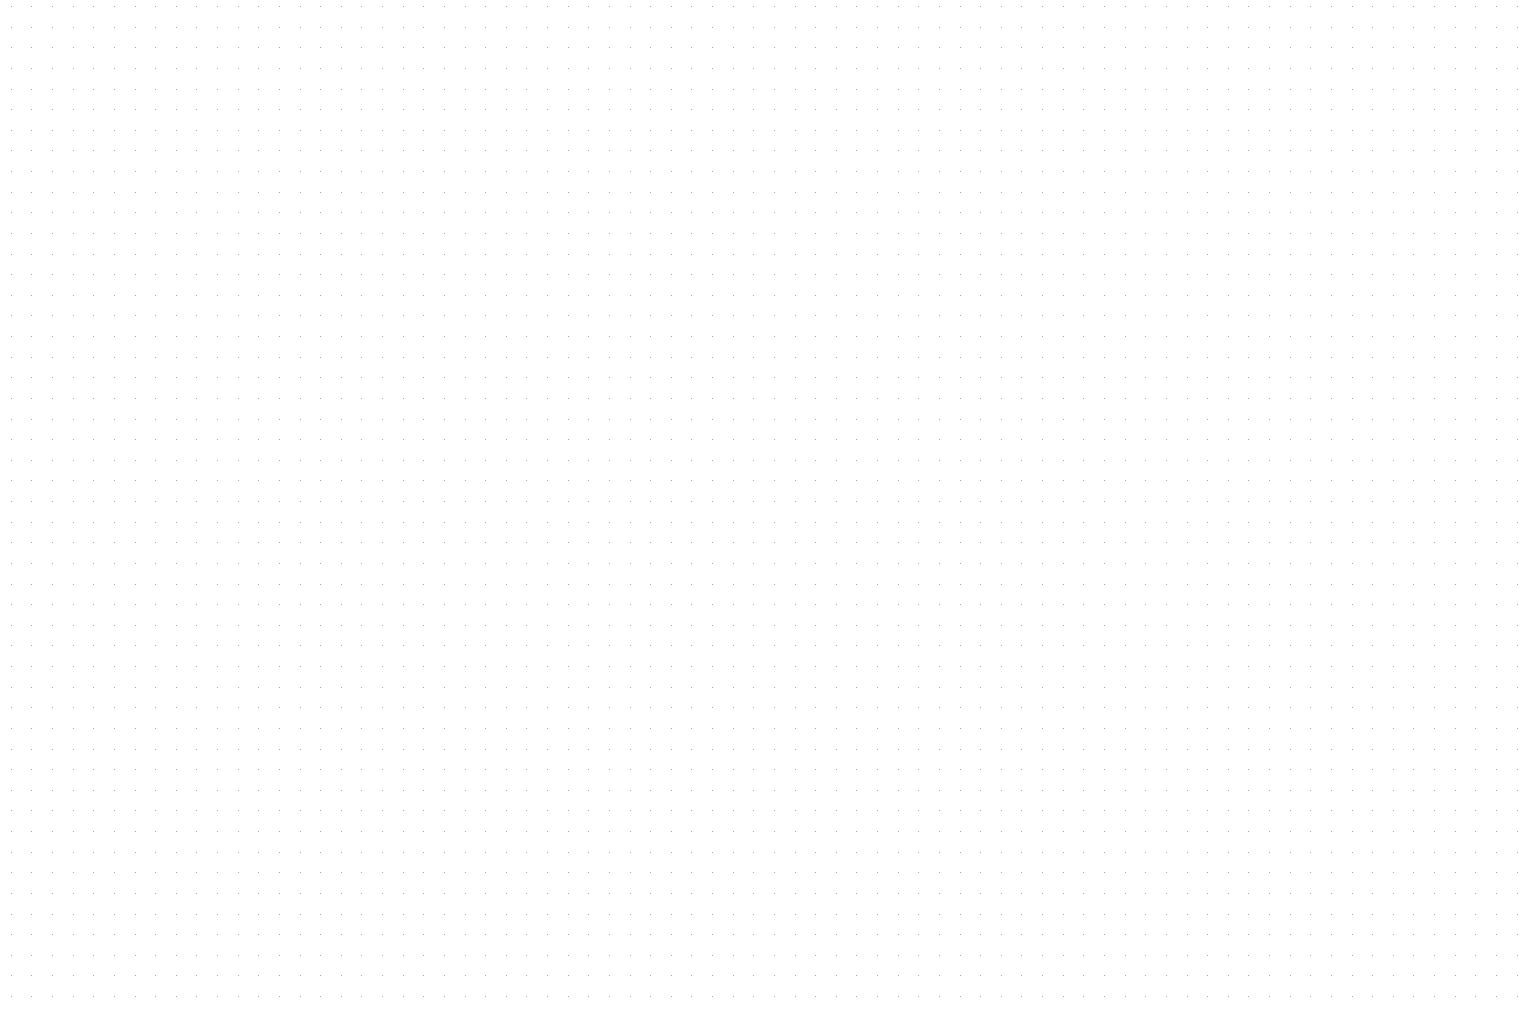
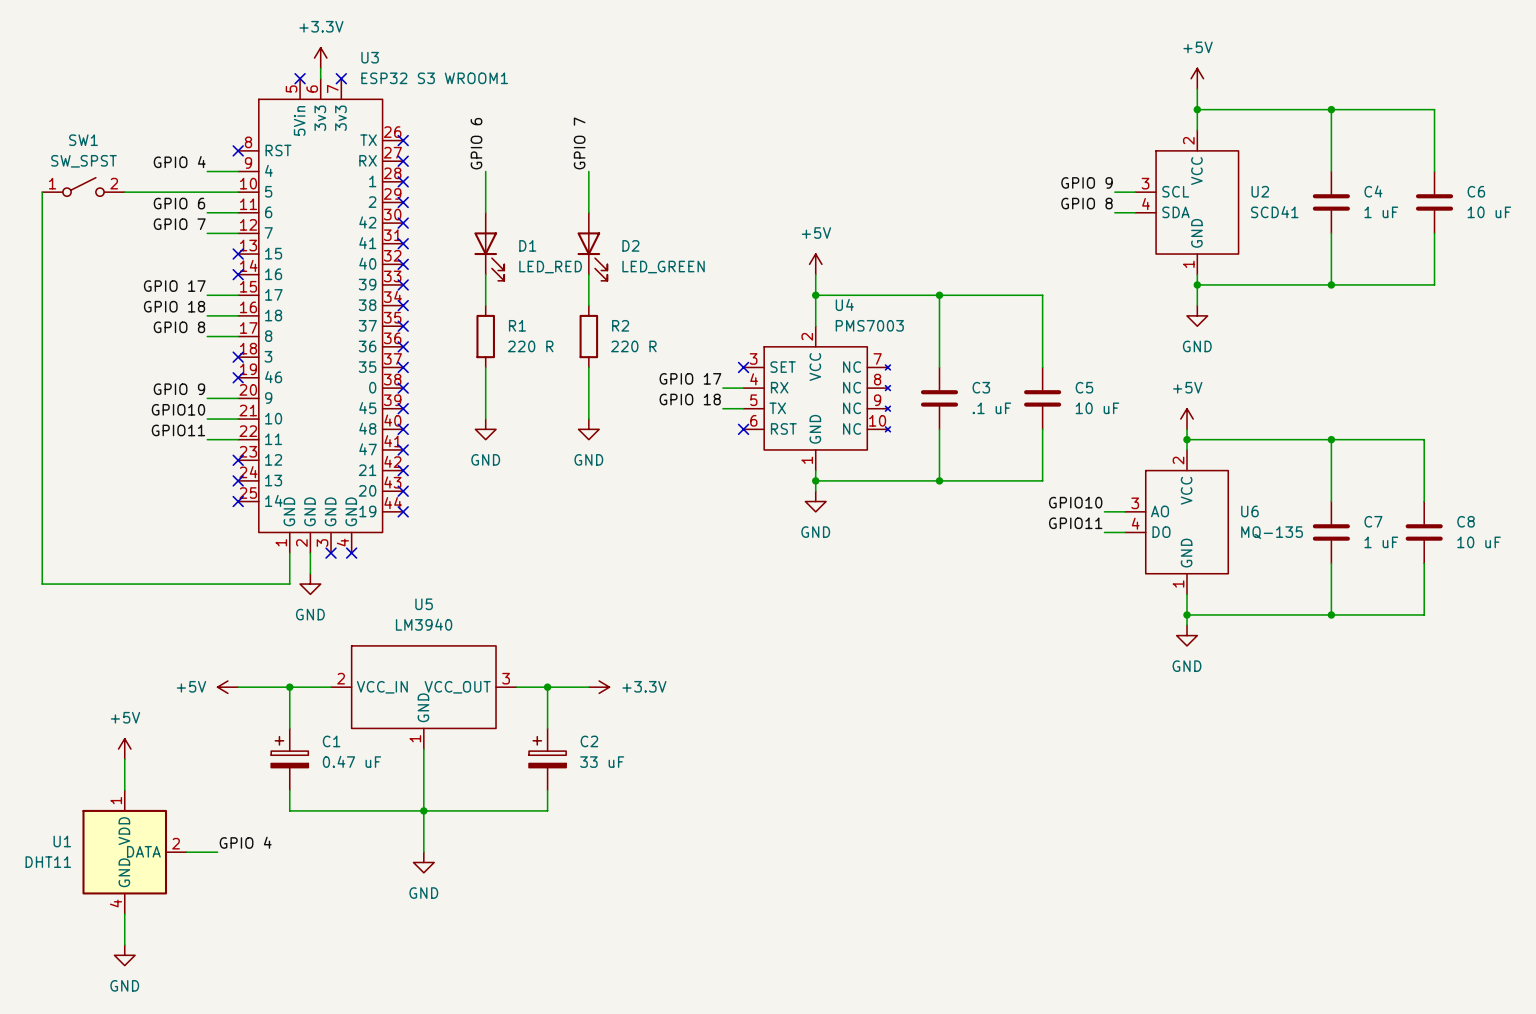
power symbol: none -> +3.3V (320, 58)
wire: none -> (320, 68) (320, 78)
no-connect mark: none -> (300, 78)
no-connect mark: none -> (341, 78)
power symbol: none -> +5V (1197, 78)
wire: none -> (1197, 89) (1197, 130)
wire: none -> (1197, 109) (1434, 109) (1434, 171)
junction: none -> (1197, 109)
wire: none -> (1331, 109) (1331, 171)
junction: none -> (1331, 109)
no-connect mark: none -> (403, 140)
label: none -> GPIO 6 (476, 143)
label: none -> GPIO 7 (579, 143)
no-connect mark: none -> (238, 150)
no-connect mark: none -> (403, 161)
label: none -> GPIO 4 (179, 162)
wire: none -> (207, 171) (238, 171)
wire: none -> (485, 171) (485, 212)
wire: none -> (588, 171) (588, 212)
no-connect mark: none -> (403, 181)
label: none -> GPIO 9 (1086, 182)
SW1: none -> SW_SPST (83, 186)
wire: none -> (42, 192) (42, 584) (289, 584) (289, 553)
wire: none -> (124, 192) (238, 192)
wire: none -> (1114, 192) (1135, 192)
no-connect mark: none -> (403, 202)
U2: none -> SCD41 (1187, 202)
C4: none -> 1 uF (1331, 202)
C6: none -> 10 uF (1434, 202)
label: none -> GPIO 6 (179, 203)
label: none -> GPIO 8 (1086, 203)
wire: none -> (207, 212) (238, 212)
wire: none -> (1114, 212) (1135, 212)
no-connect mark: none -> (403, 223)
label: none -> GPIO 7 (179, 224)
wire: none -> (207, 233) (238, 233)
wire: none -> (1331, 233) (1331, 284)
wire: none -> (1434, 233) (1434, 284) (1197, 284)
no-connect mark: none -> (403, 243)
D1: none -> LED_RED (489, 246)
D2: none -> LED_GREEN (592, 246)
no-connect mark: none -> (238, 254)
no-connect mark: none -> (403, 264)
power symbol: none -> +5V (815, 264)
no-connect mark: none -> (238, 274)
wire: none -> (485, 274) (485, 305)
wire: none -> (588, 274) (588, 305)
wire: none -> (815, 274) (815, 326)
wire: none -> (1197, 274) (1197, 305)
no-connect mark: none -> (403, 284)
junction: none -> (1197, 284)
junction: none -> (1331, 284)
label: none -> GPIO 17 (174, 286)
wire: none -> (207, 295) (238, 295)
wire: none -> (815, 295) (1042, 295) (1042, 367)
junction: none -> (815, 295)
wire: none -> (939, 295) (939, 367)
junction: none -> (939, 295)
no-connect mark: none -> (403, 305)
label: none -> GPIO 18 (174, 306)
wire: none -> (207, 315) (238, 315)
U3: none -> ESP32 S3 WROOM1 (320, 315)
power symbol: none -> GND (1197, 315)
no-connect mark: none -> (403, 326)
label: none -> GPIO 8 (179, 327)
wire: none -> (207, 336) (238, 336)
R1: none -> 220 R (485, 336)
R2: none -> 220 R (588, 336)
no-connect mark: none -> (403, 346)
no-connect mark: none -> (238, 357)
no-connect mark: none -> (403, 367)
wire: none -> (485, 367) (485, 419)
wire: none -> (588, 367) (588, 419)
no-connect mark: none -> (743, 367)
no-connect mark: none -> (238, 377)
label: none -> GPIO 17 (690, 378)
no-connect mark: none -> (403, 388)
wire: none -> (722, 388) (743, 388)
label: none -> GPIO 9 (179, 389)
wire: none -> (207, 398) (238, 398)
U4: none -> PMS7003 (816, 398)
C3: none -> .1 uF (939, 398)
C5: none -> 10 uF (1042, 398)
label: none -> GPIO 18 (690, 399)
no-connect mark: none -> (403, 408)
wire: none -> (722, 408) (743, 408)
label: none -> GPIO10 (178, 409)
wire: none -> (207, 419) (238, 419)
power symbol: none -> +5V (1187, 419)
no-connect mark: none -> (403, 429)
power symbol: none -> GND (485, 429)
power symbol: none -> GND (588, 429)
no-connect mark: none -> (743, 429)
wire: none -> (939, 429) (939, 480)
wire: none -> (1042, 429) (1042, 480) (815, 480)
wire: none -> (1187, 429) (1187, 449)
label: none -> GPIO11 (178, 430)
wire: none -> (207, 439) (238, 439)
wire: none -> (1187, 439) (1424, 439) (1424, 501)
junction: none -> (1187, 439)
wire: none -> (1331, 439) (1331, 501)
junction: none -> (1331, 439)
no-connect mark: none -> (403, 449)
no-connect mark: none -> (238, 460)
no-connect mark: none -> (403, 470)
wire: none -> (815, 470) (815, 491)
no-connect mark: none -> (238, 480)
junction: none -> (815, 480)
junction: none -> (939, 480)
no-connect mark: none -> (403, 491)
no-connect mark: none -> (238, 501)
power symbol: none -> GND (815, 501)
label: none -> GPIO10 (1075, 502)
no-connect mark: none -> (403, 511)
wire: none -> (1104, 511) (1125, 511)
U6: none -> MQ-135 (1176, 522)
label: none -> GPIO11 (1075, 523)
wire: none -> (1104, 532) (1125, 532)
C7: none -> 1 uF (1331, 532)
C8: none -> 10 uF (1424, 532)
wire: none -> (310, 553) (310, 573)
no-connect mark: none -> (331, 553)
no-connect mark: none -> (351, 553)
wire: none -> (1331, 563) (1331, 614)
wire: none -> (1424, 563) (1424, 614) (1187, 614)
power symbol: none -> GND (310, 584)
wire: none -> (1187, 594) (1187, 625)
junction: none -> (1187, 614)
junction: none -> (1331, 614)
power symbol: none -> GND (1187, 635)
power symbol: none -> +5V (227, 687)
wire: none -> (238, 687) (331, 687)
wire: none -> (289, 687) (289, 728)
junction: none -> (289, 687)
wire: none -> (516, 687) (588, 687)
wire: none -> (547, 687) (547, 728)
junction: none -> (547, 687)
power symbol: none -> +3.3V (599, 687)
U5: none -> LM3940 (423, 697)
power symbol: none -> +5V (124, 749)
wire: none -> (423, 749) (423, 852)
wire: none -> (124, 759) (124, 790)
C1: none -> 0.47 uF (289, 759)
C2: none -> 33 uF (547, 759)
wire: none -> (289, 790) (289, 810) (547, 810) (547, 790)
junction: none -> (423, 810)
label: none -> GPIO 4 (245, 842)
U1: none -> DHT11 (134, 852)
wire: none -> (186, 852) (217, 852)
power symbol: none -> GND (423, 862)
wire: none -> (124, 914) (124, 945)
power symbol: none -> GND (124, 955)

